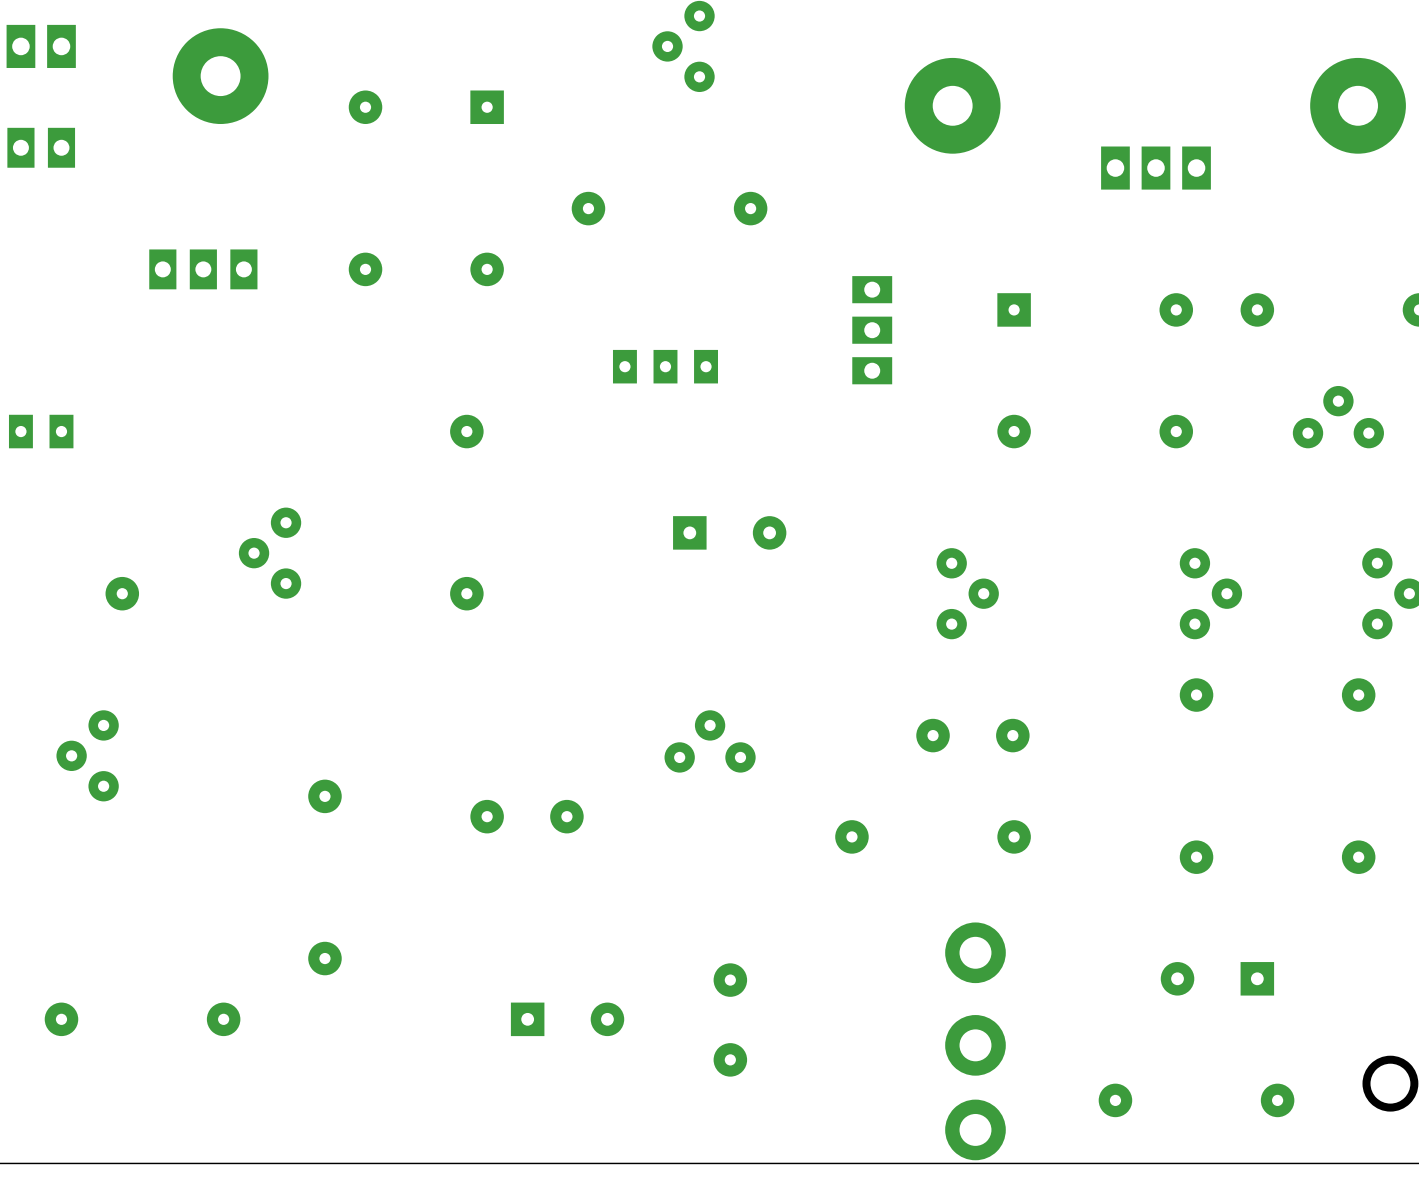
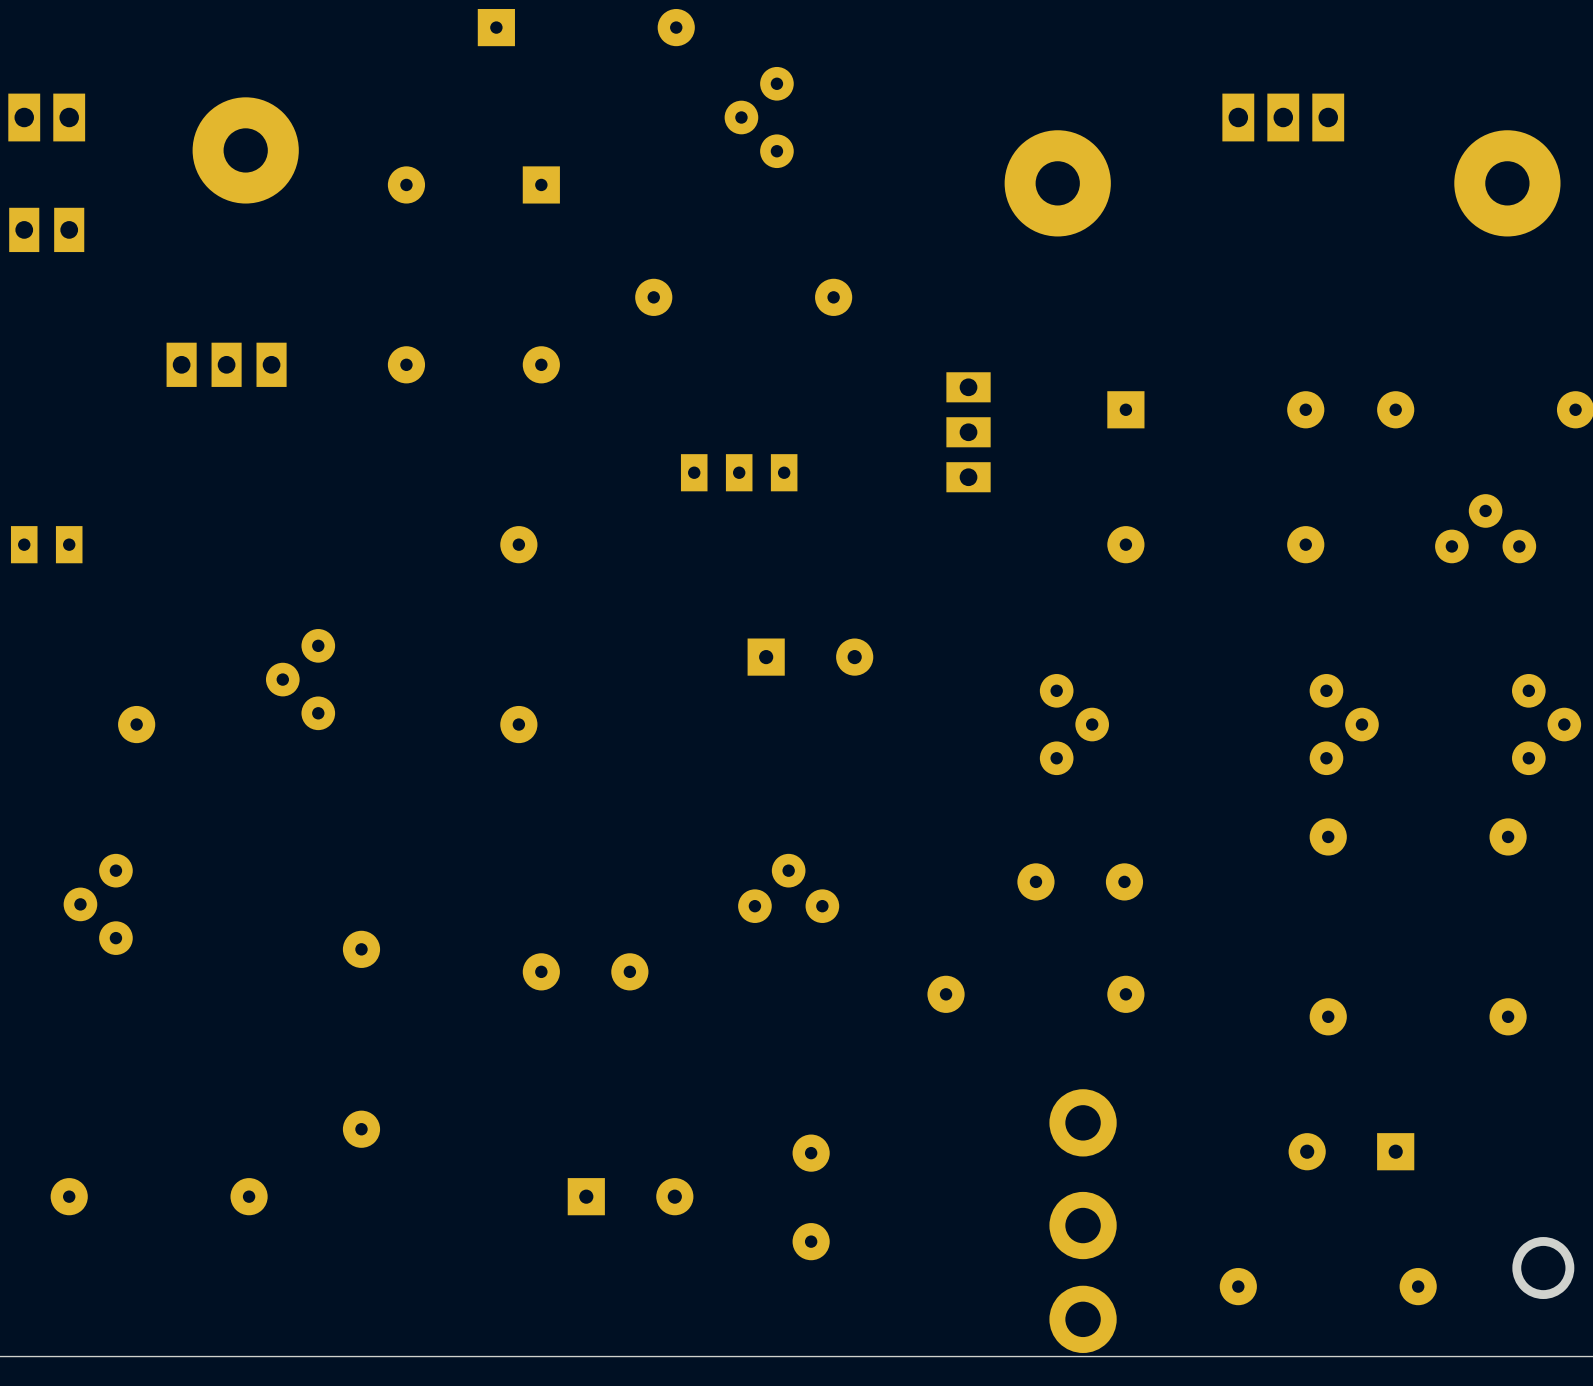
part position: (1155, 168) -> (1283, 117)

